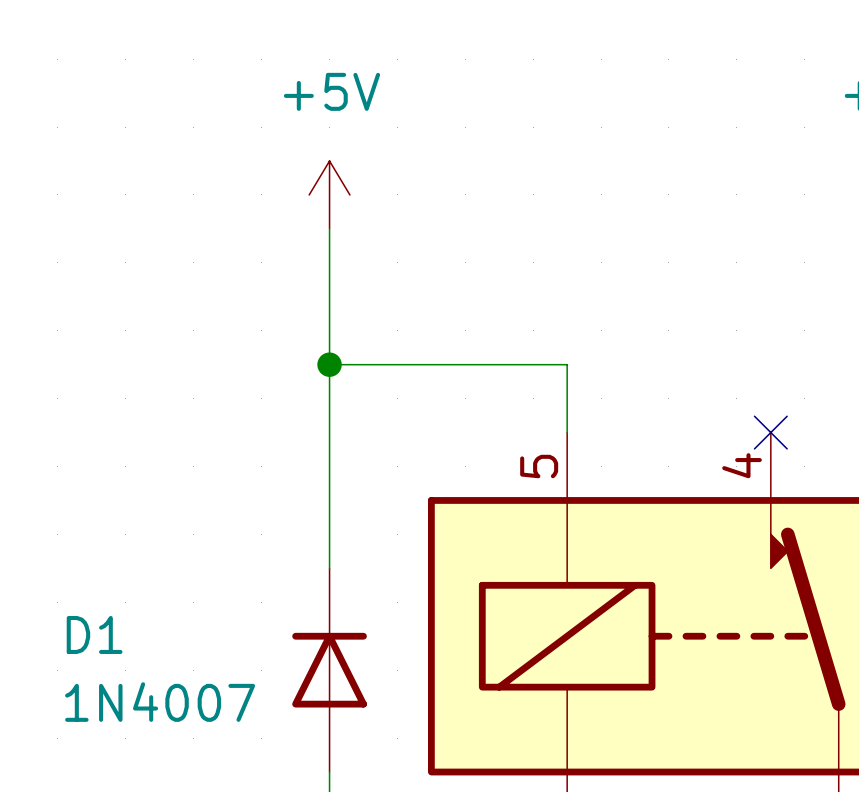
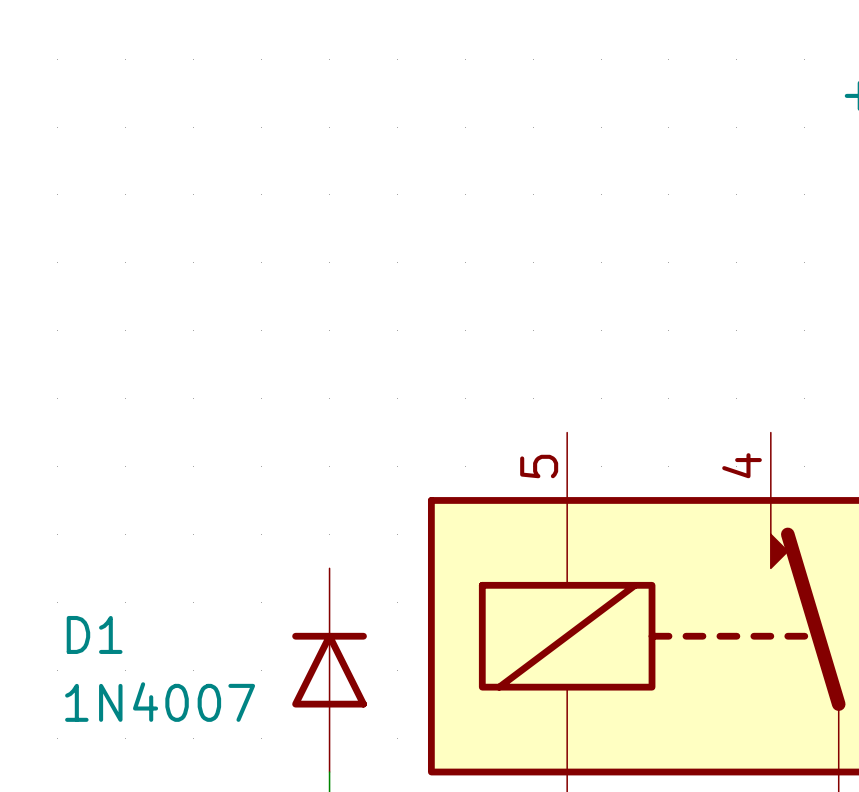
power symbol: +5V (329, 194) -> none
wire: (329, 228) (329, 568) -> none
wire: (329, 364) (567, 364) (567, 432) -> none
junction: (329, 364) -> none
no-connect mark: (770, 432) -> none

